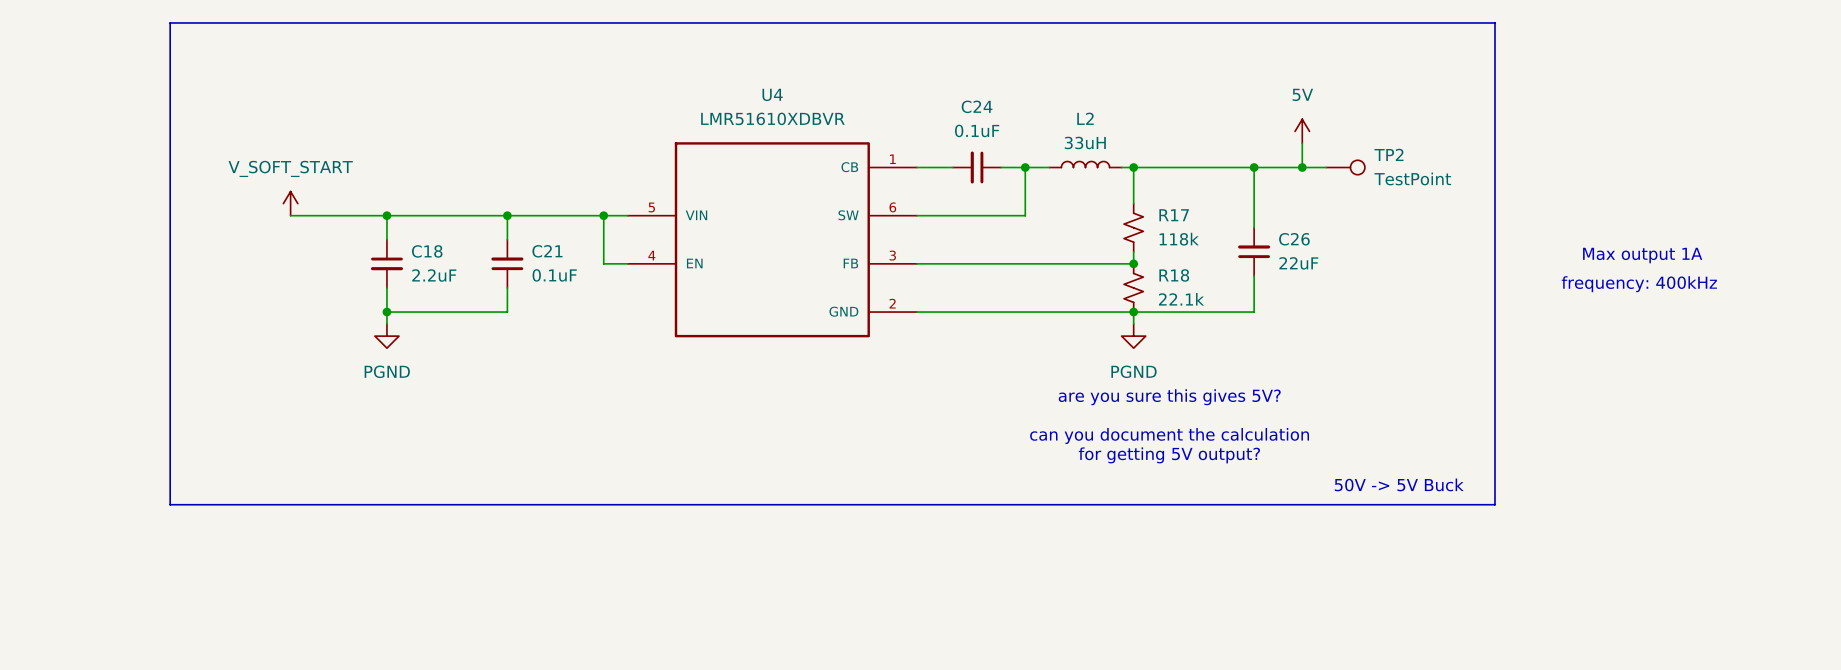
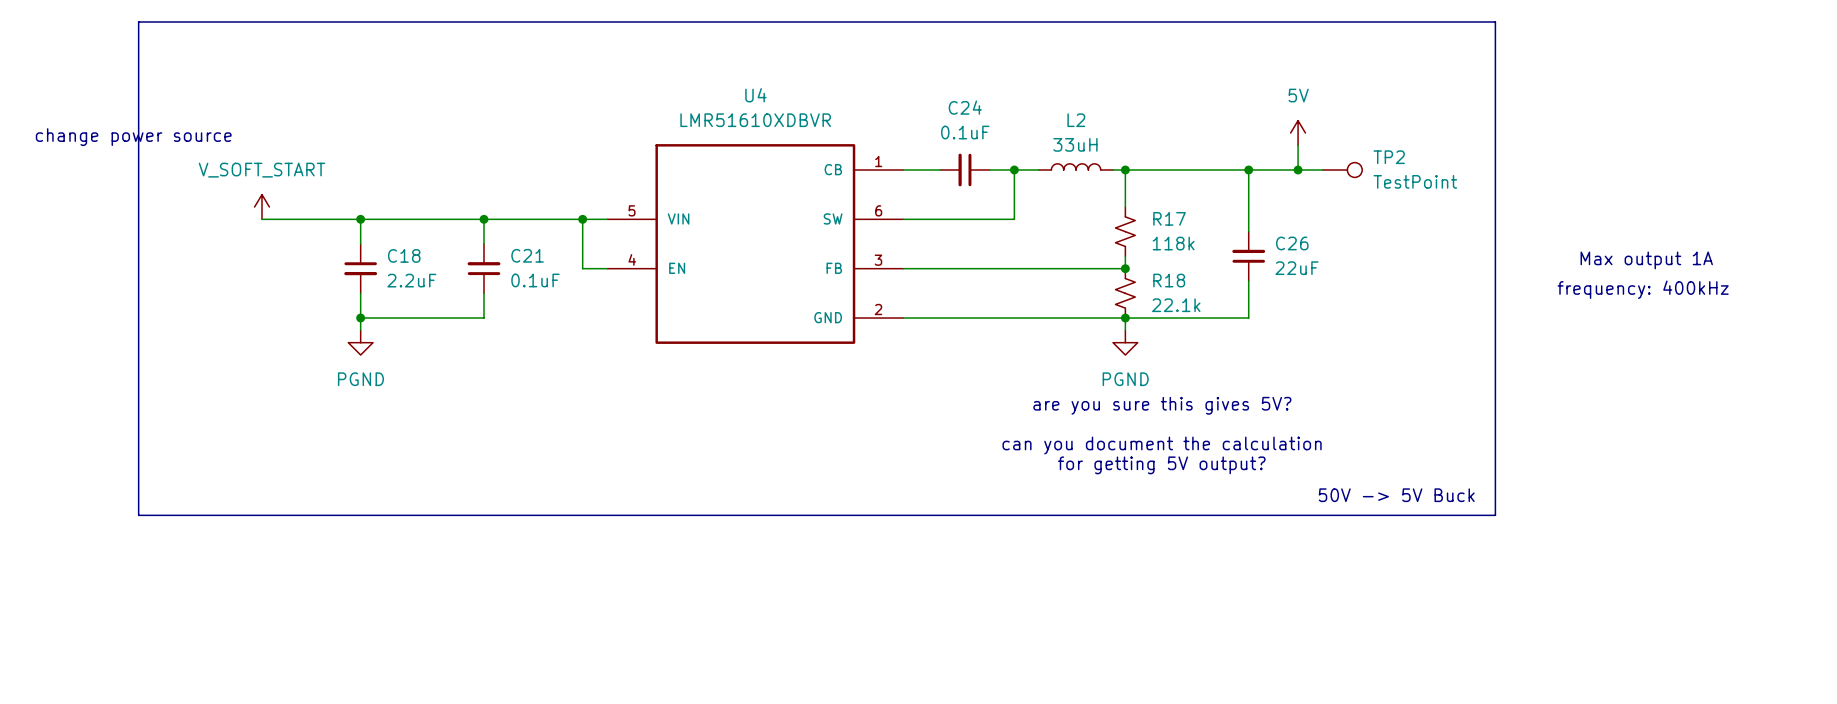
text: none -> change power source (133, 137)

